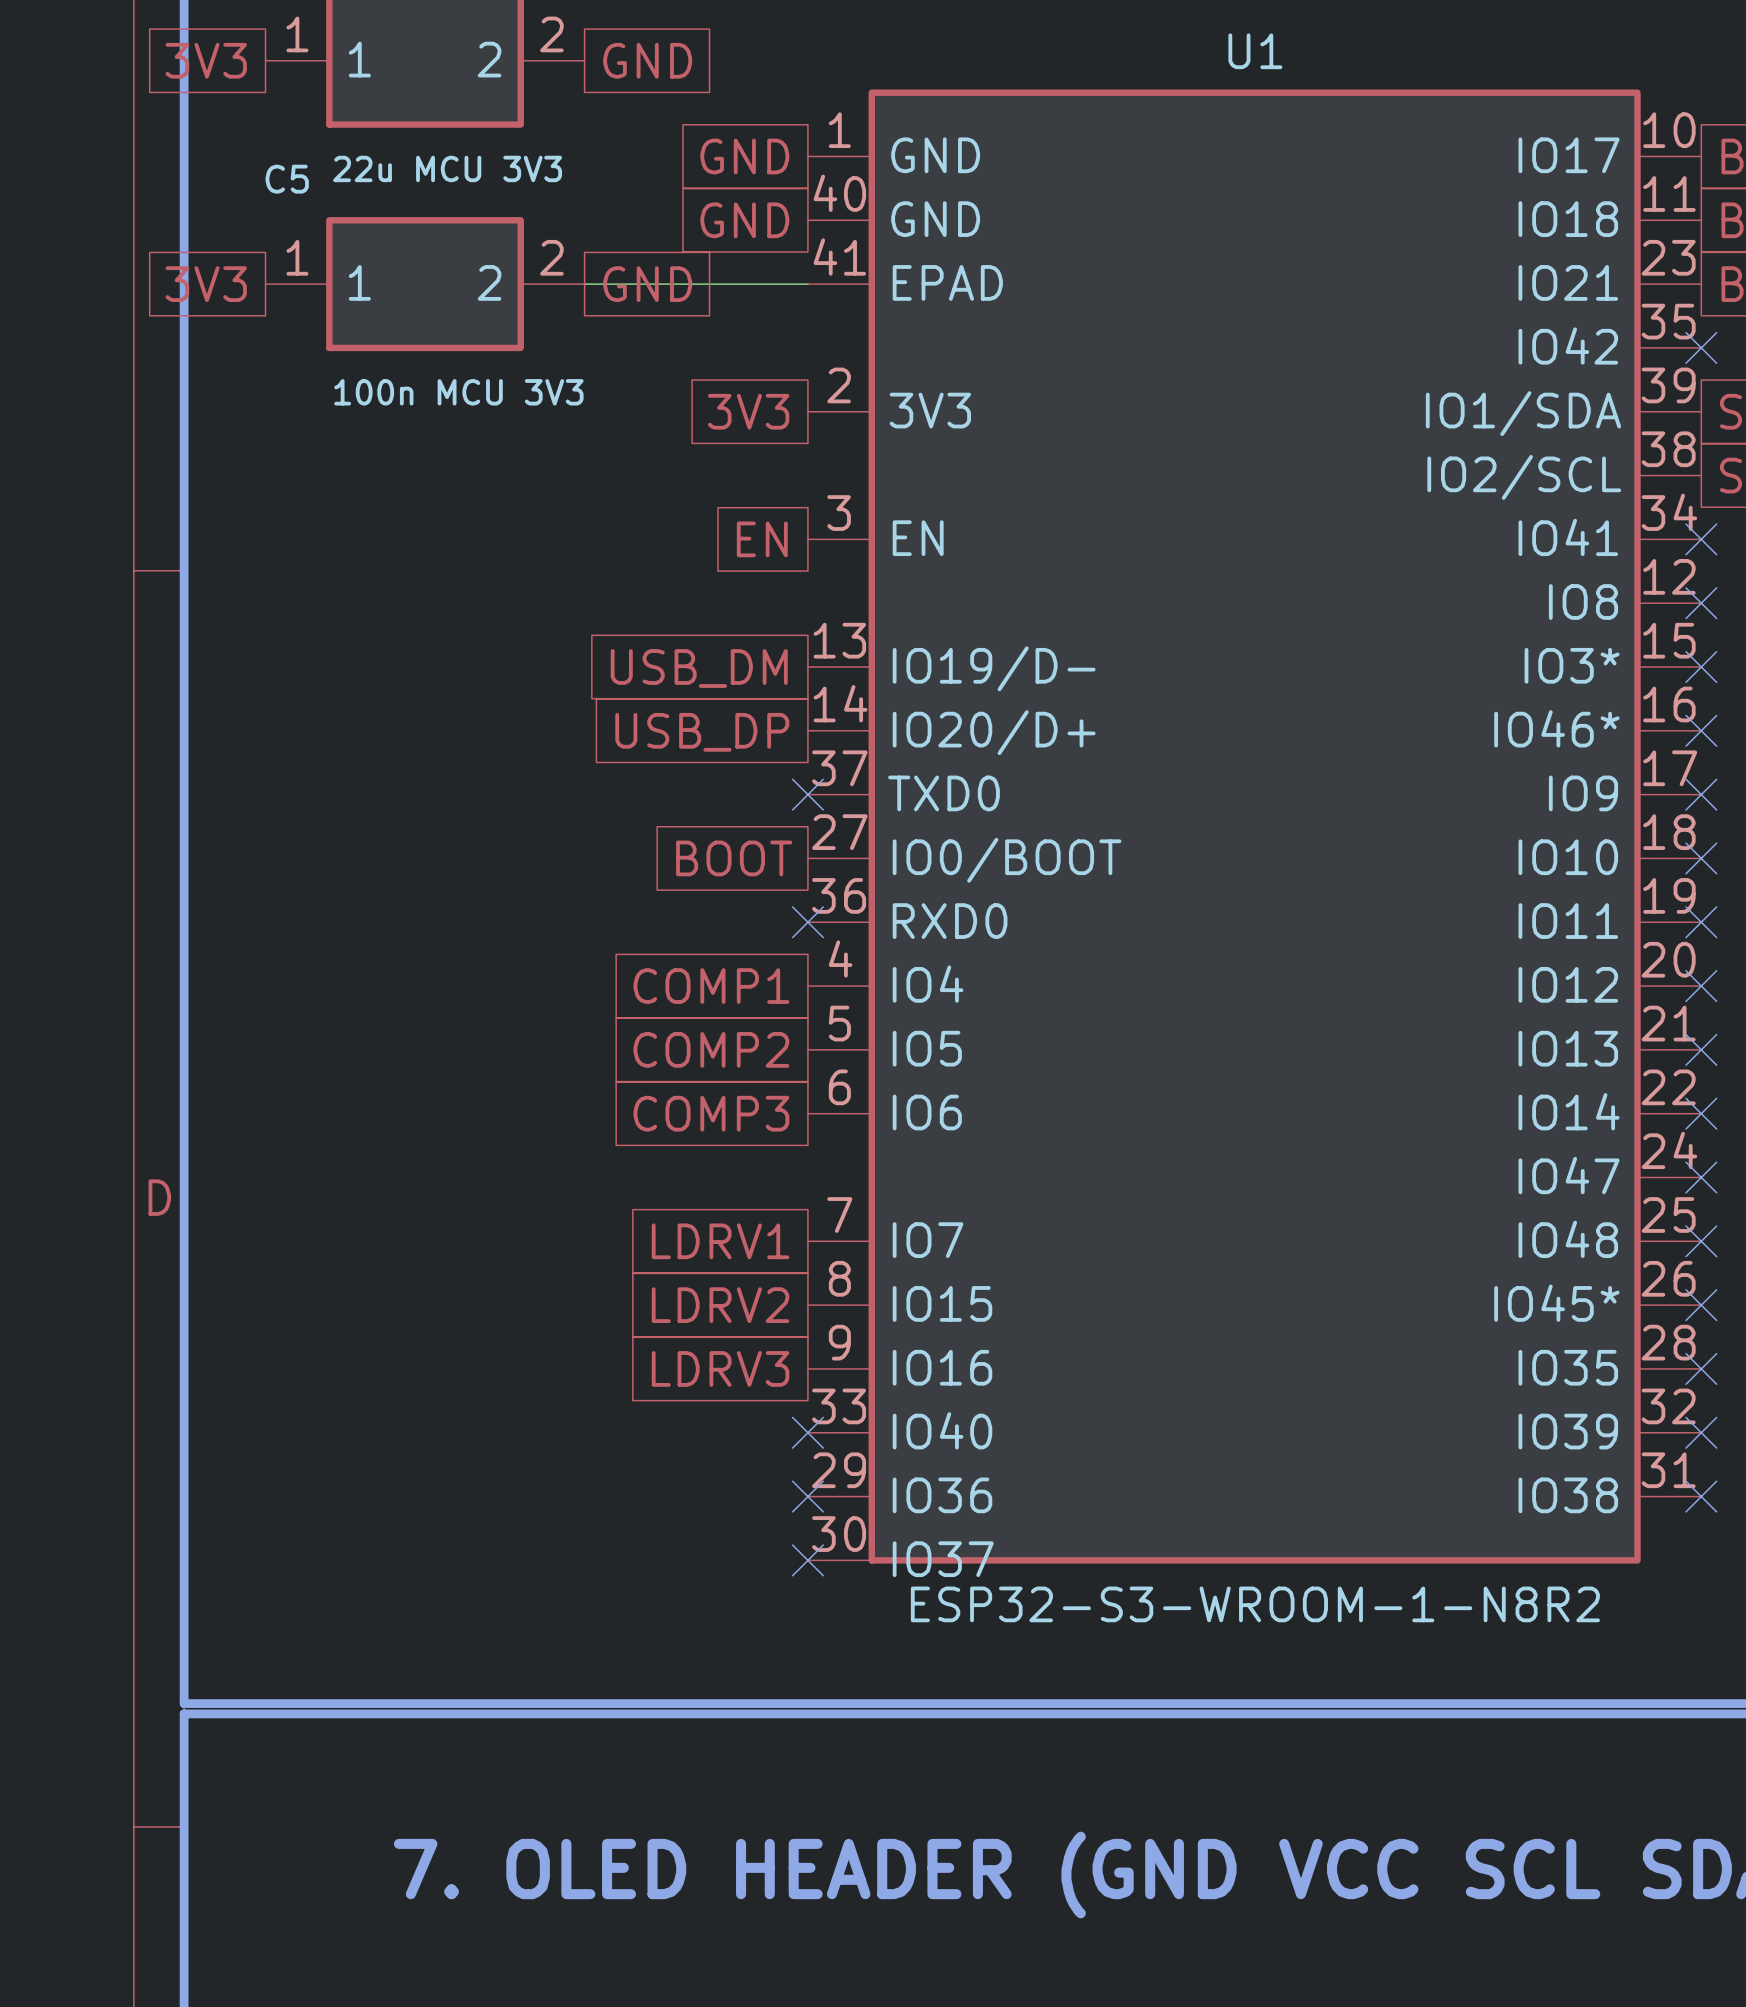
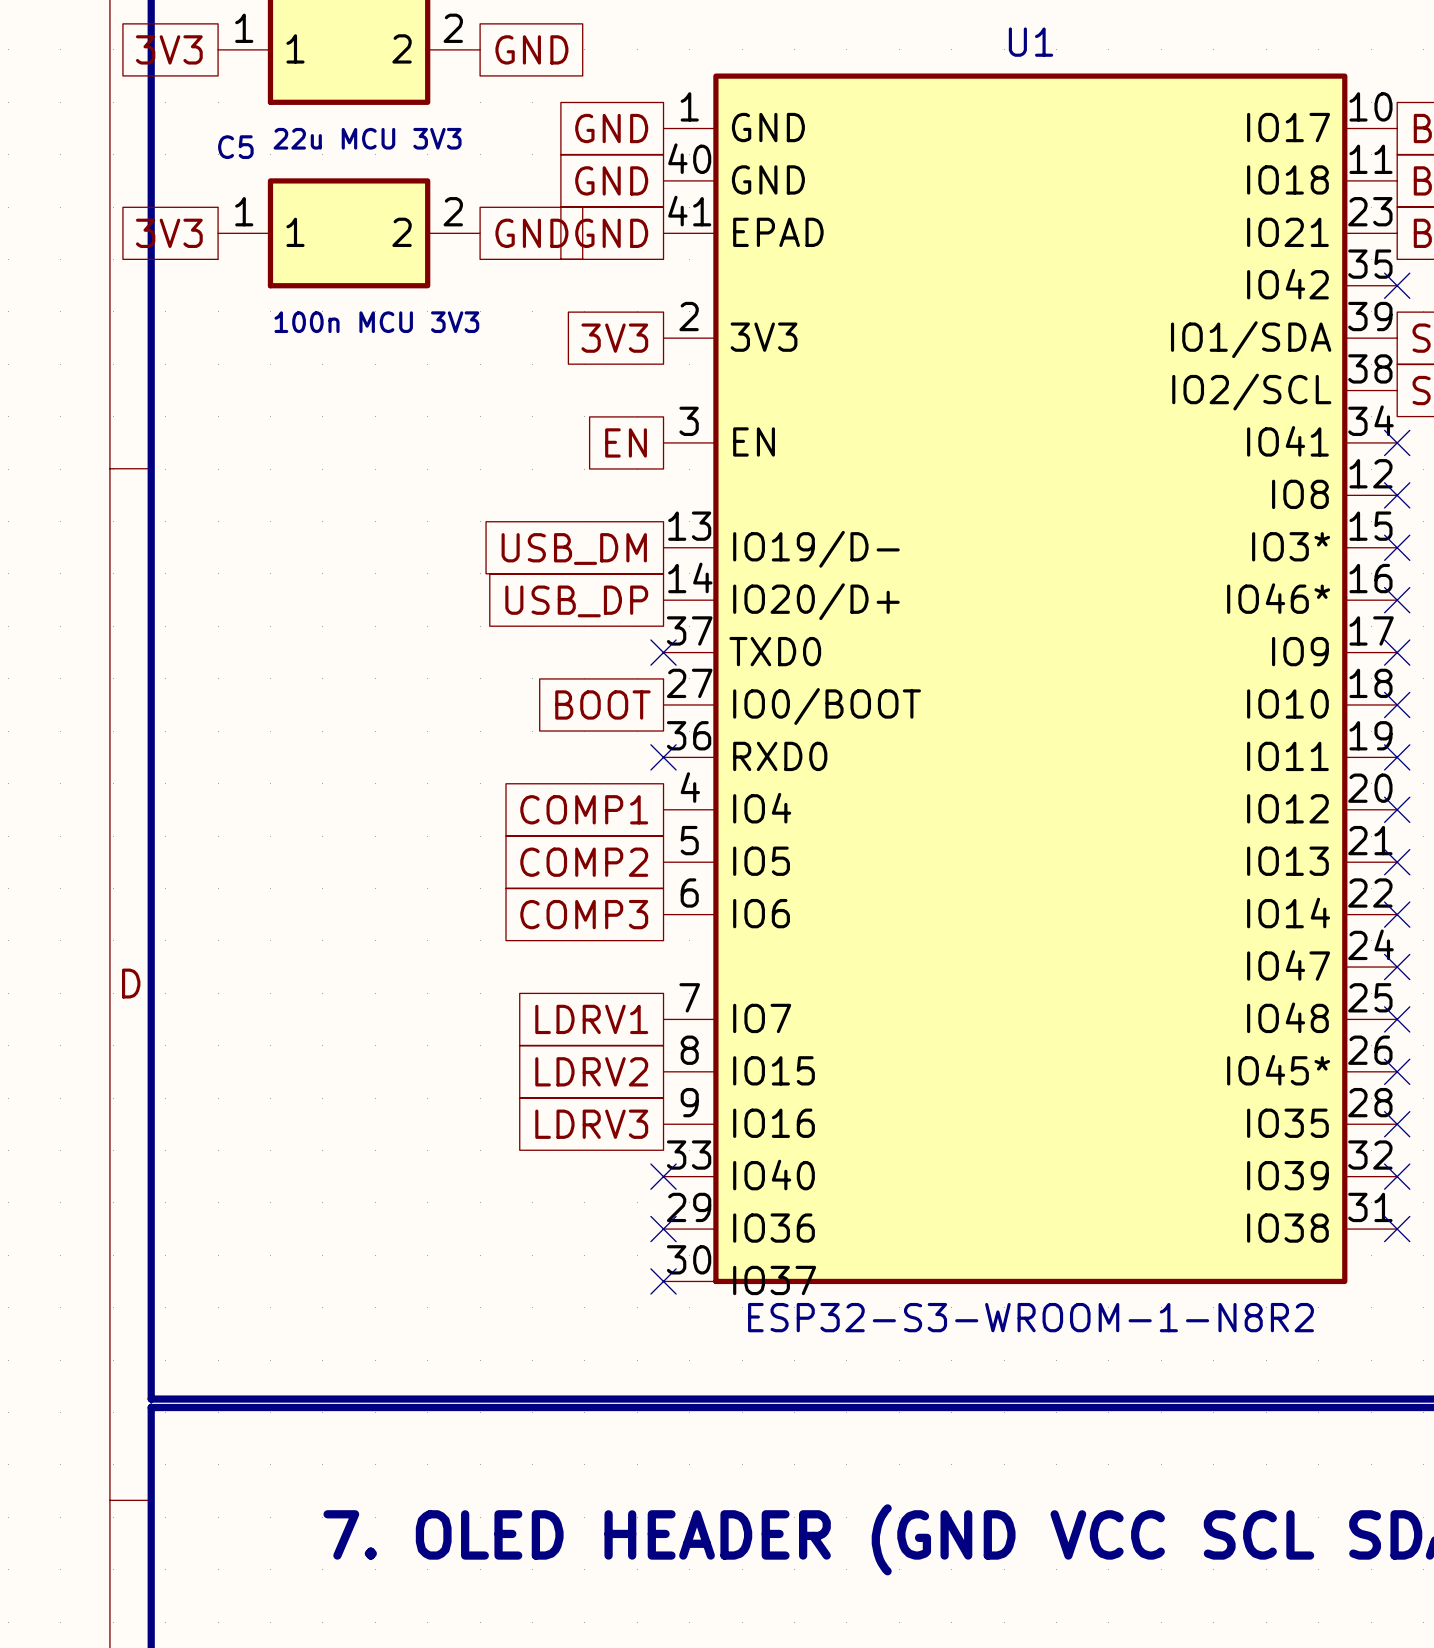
wire: (584, 284) (807, 284) -> none
global label: none -> GND (611, 233)

